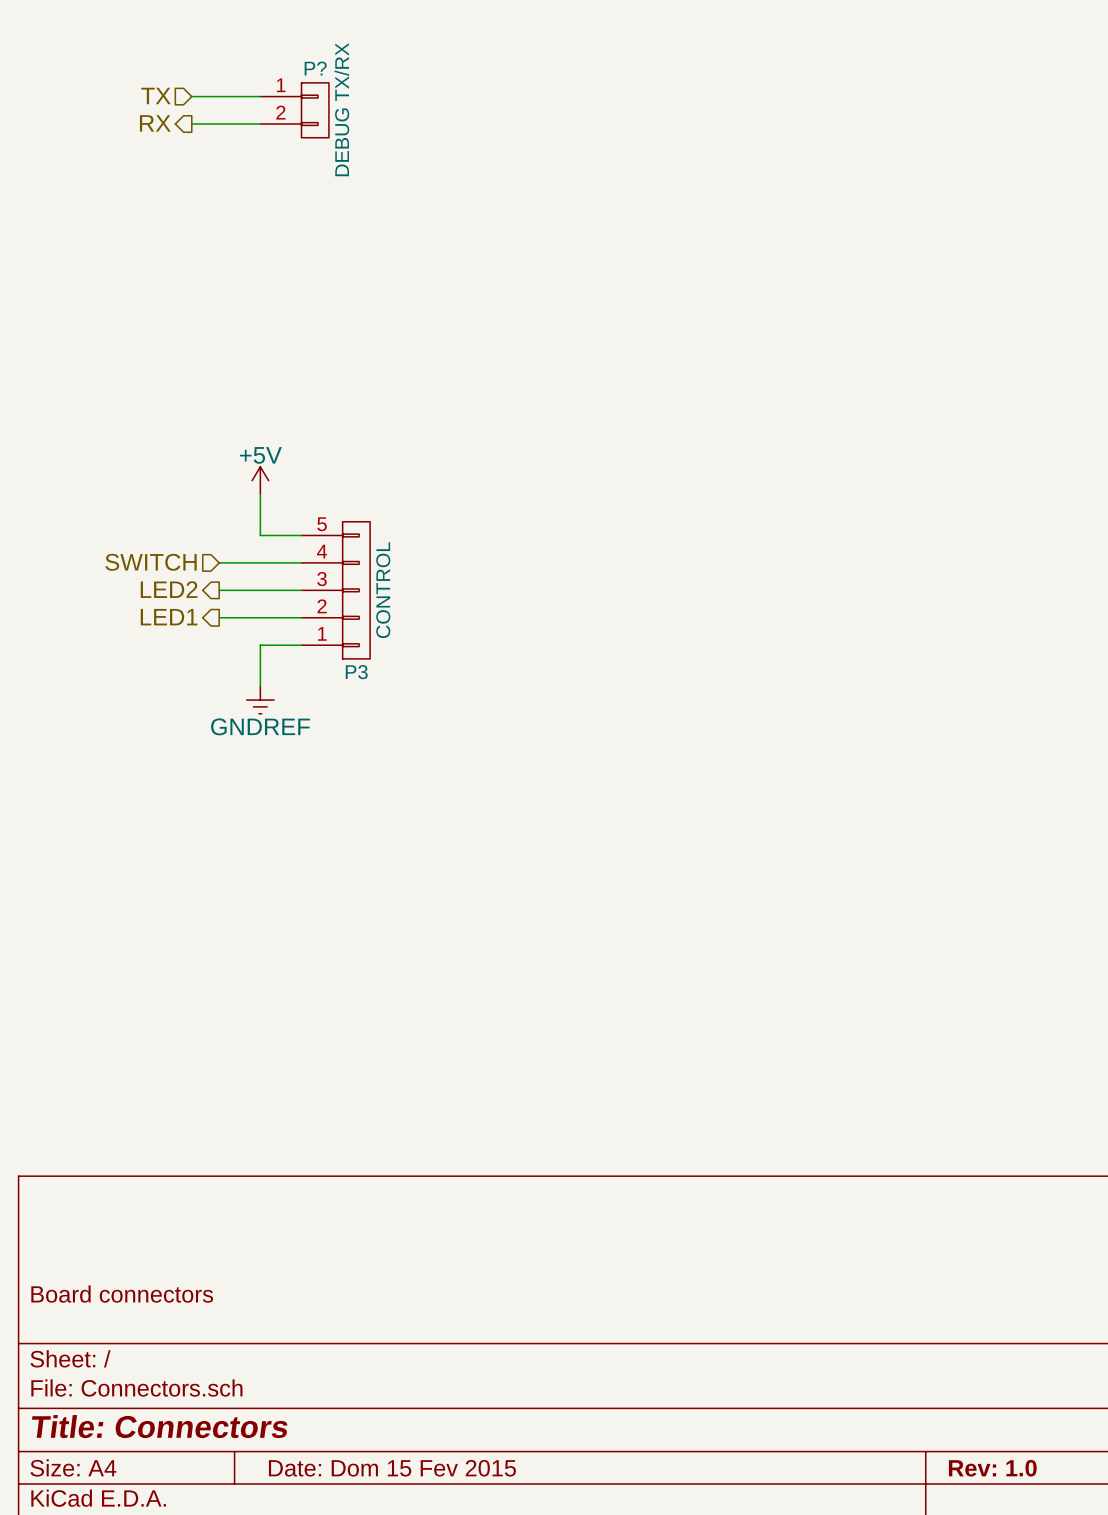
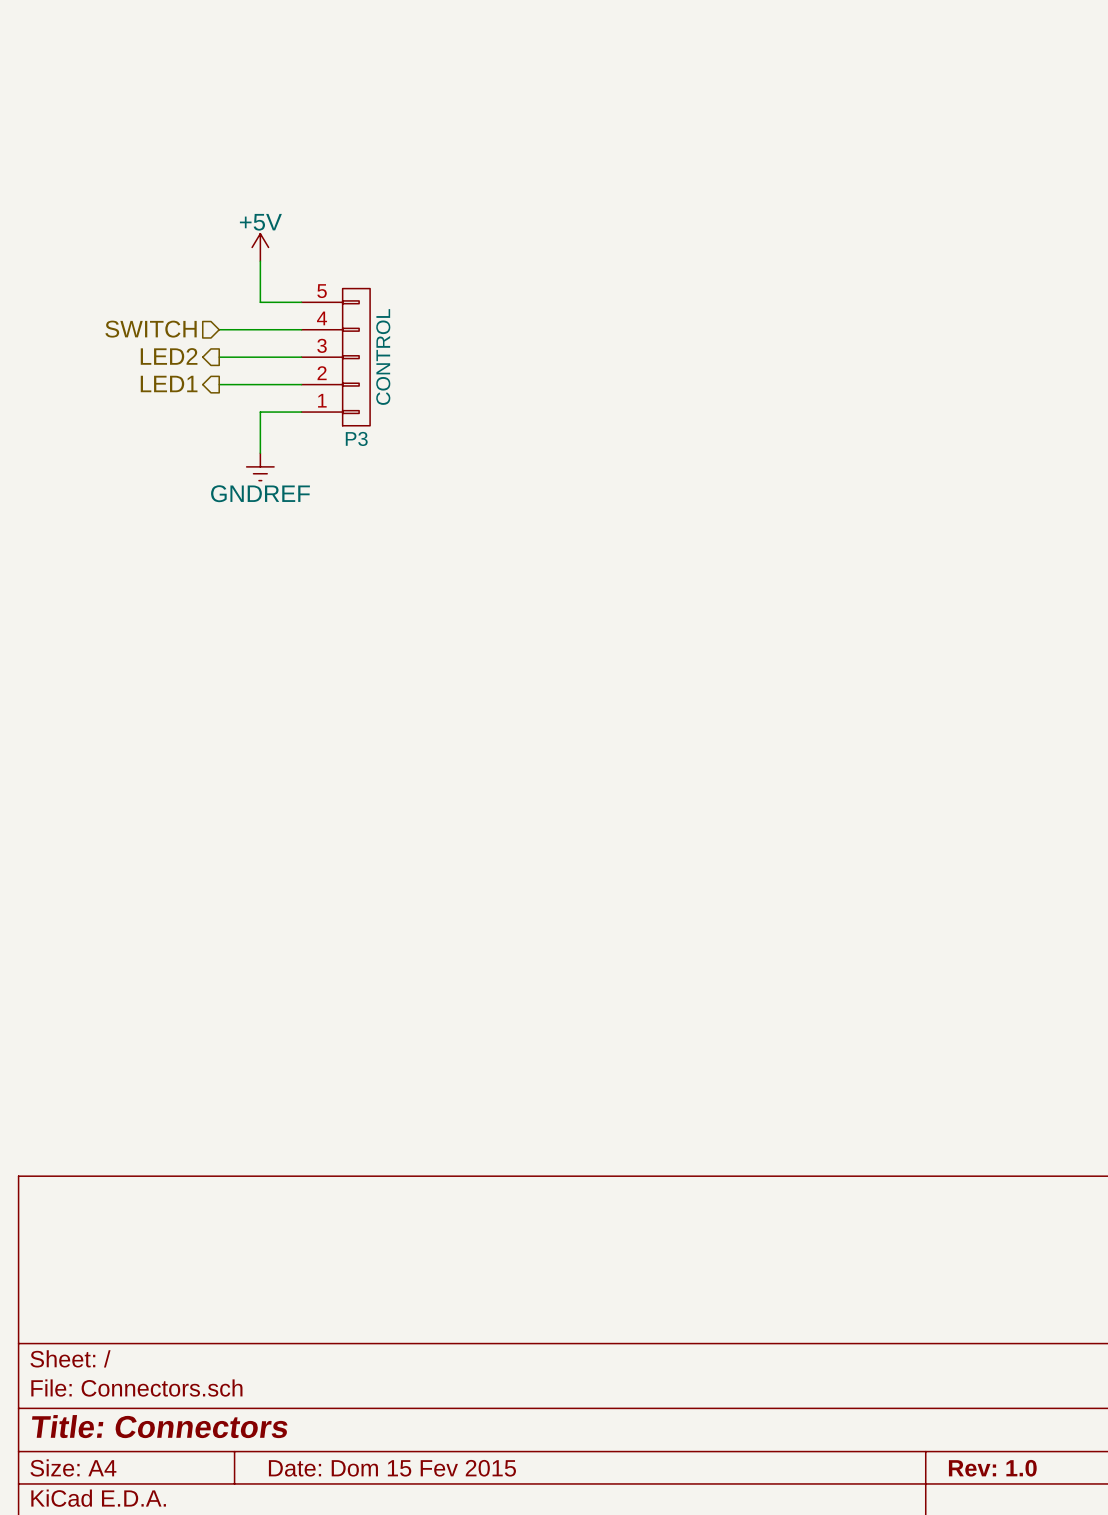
hierarchical label: TX (155, 95) -> none
wire: (191, 96) (260, 96) -> none
P?: DEBUG TX/RX (294, 110) -> none
hierarchical label: RX (155, 123) -> none
wire: (191, 124) (260, 124) -> none
power symbol position: +5V (260, 480) -> +5V (260, 247)
wire: (260, 494) (260, 535) (301, 535) -> (260, 261) (260, 302) (301, 302)
hierarchical label position: SWITCH (151, 562) -> SWITCH (151, 329)
wire: (219, 562) (301, 562) -> (219, 329) (301, 329)
hierarchical label position: LED2 (169, 589) -> LED2 (169, 356)
wire: (219, 590) (301, 590) -> (219, 357) (301, 357)
P3 position: (335, 590) -> (335, 357)
hierarchical label position: LED1 (169, 617) -> LED1 (169, 383)
wire: (219, 617) (301, 617) -> (219, 384) (301, 384)
wire: (301, 645) (260, 645) (260, 686) -> (301, 412) (260, 412) (260, 453)
power symbol position: GNDREF (260, 700) -> GNDREF (260, 466)
title block: Board connectors (122, 1294) -> none

